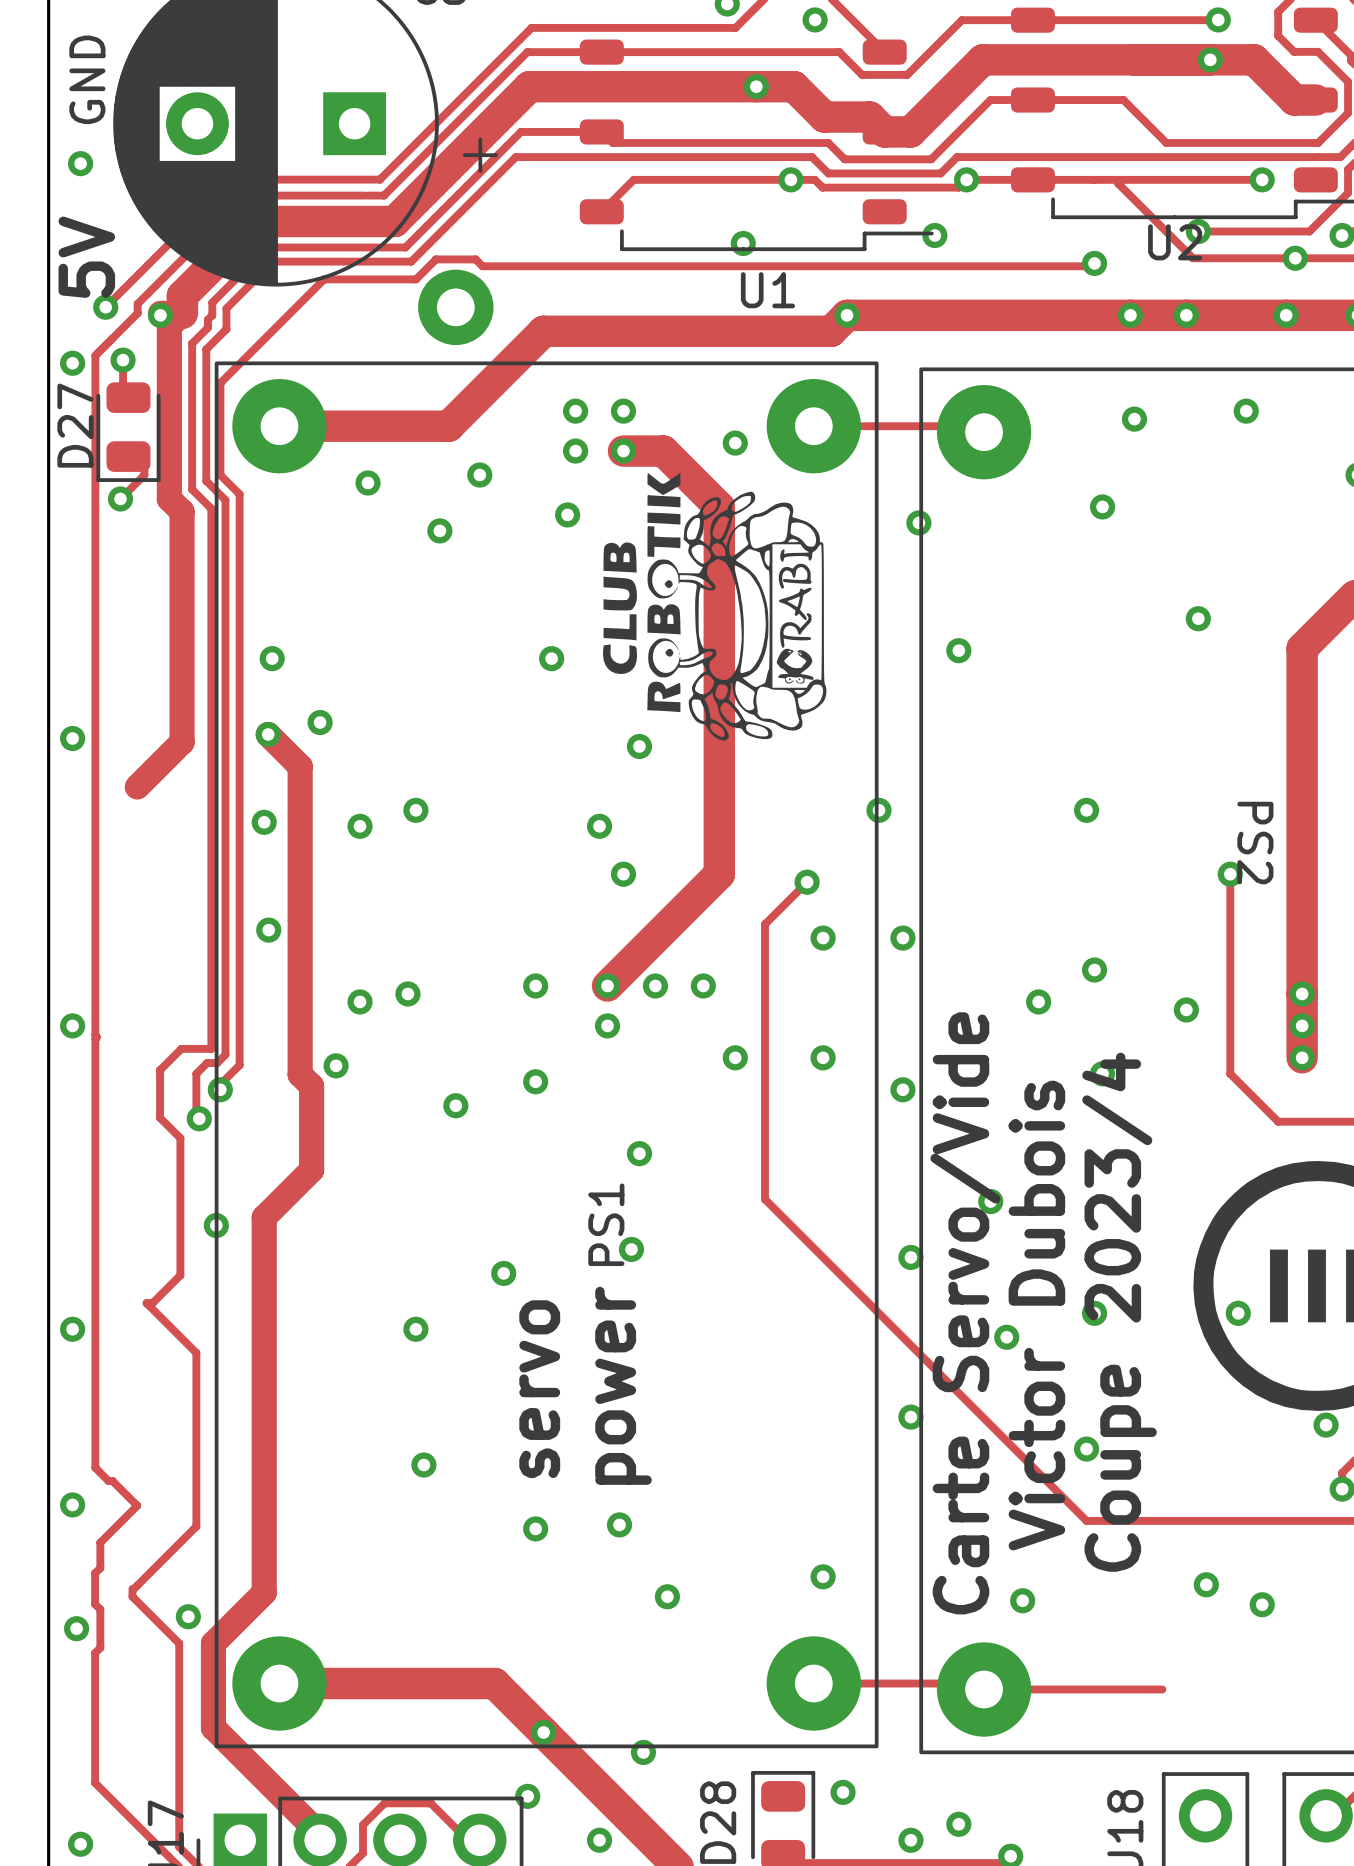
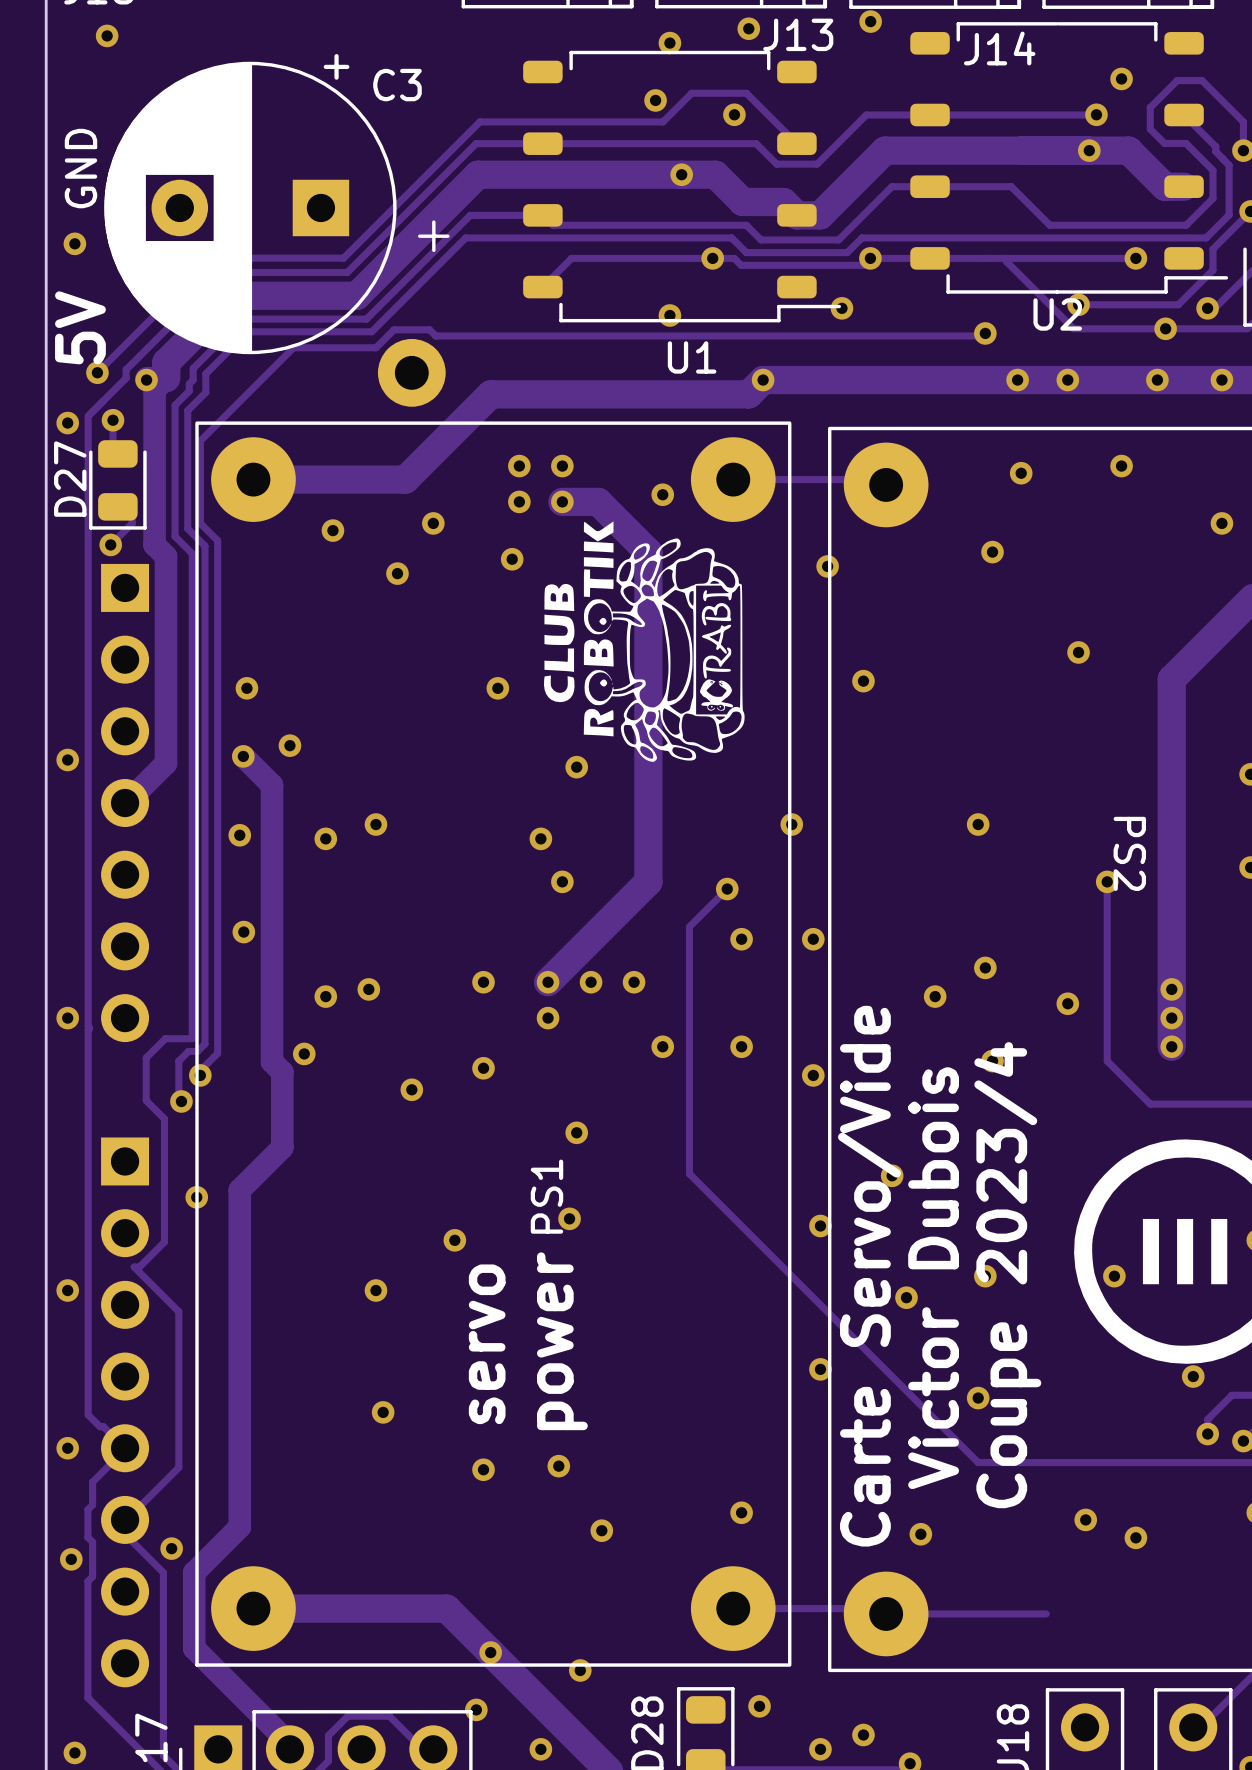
part: none -> (125, 803)
part: none -> (125, 1412)

